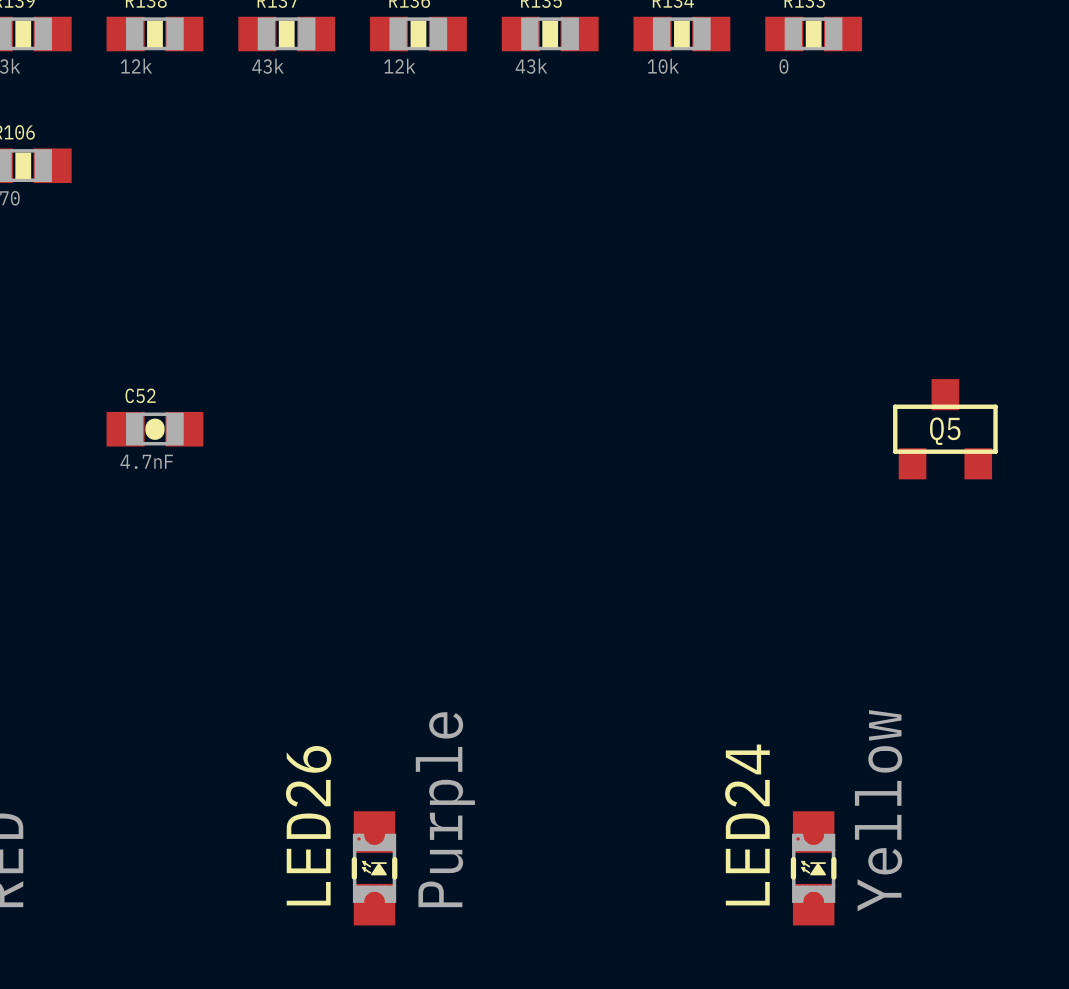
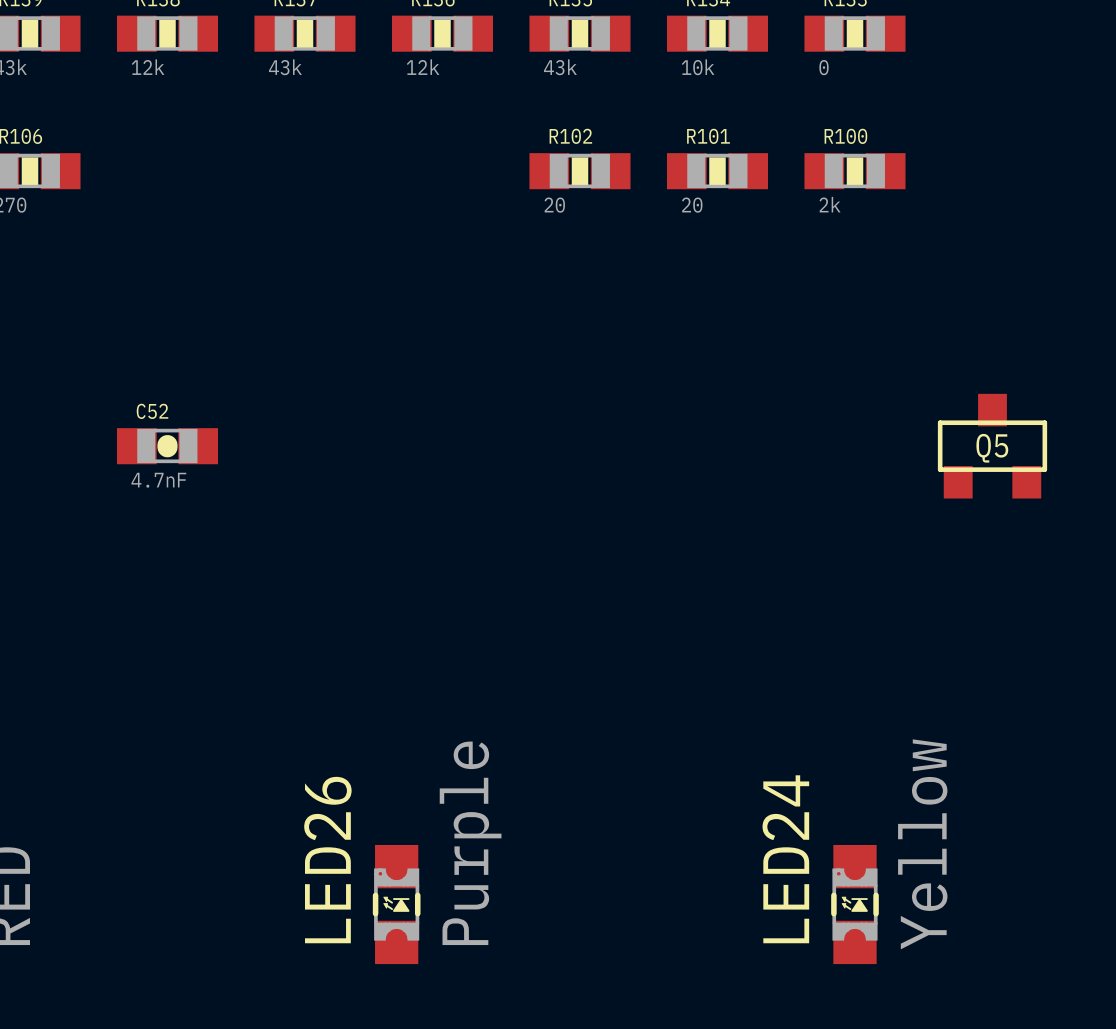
R102: none -> 20 (579, 171)
R101: none -> 20 (717, 171)
R100: none -> 2k (854, 171)

